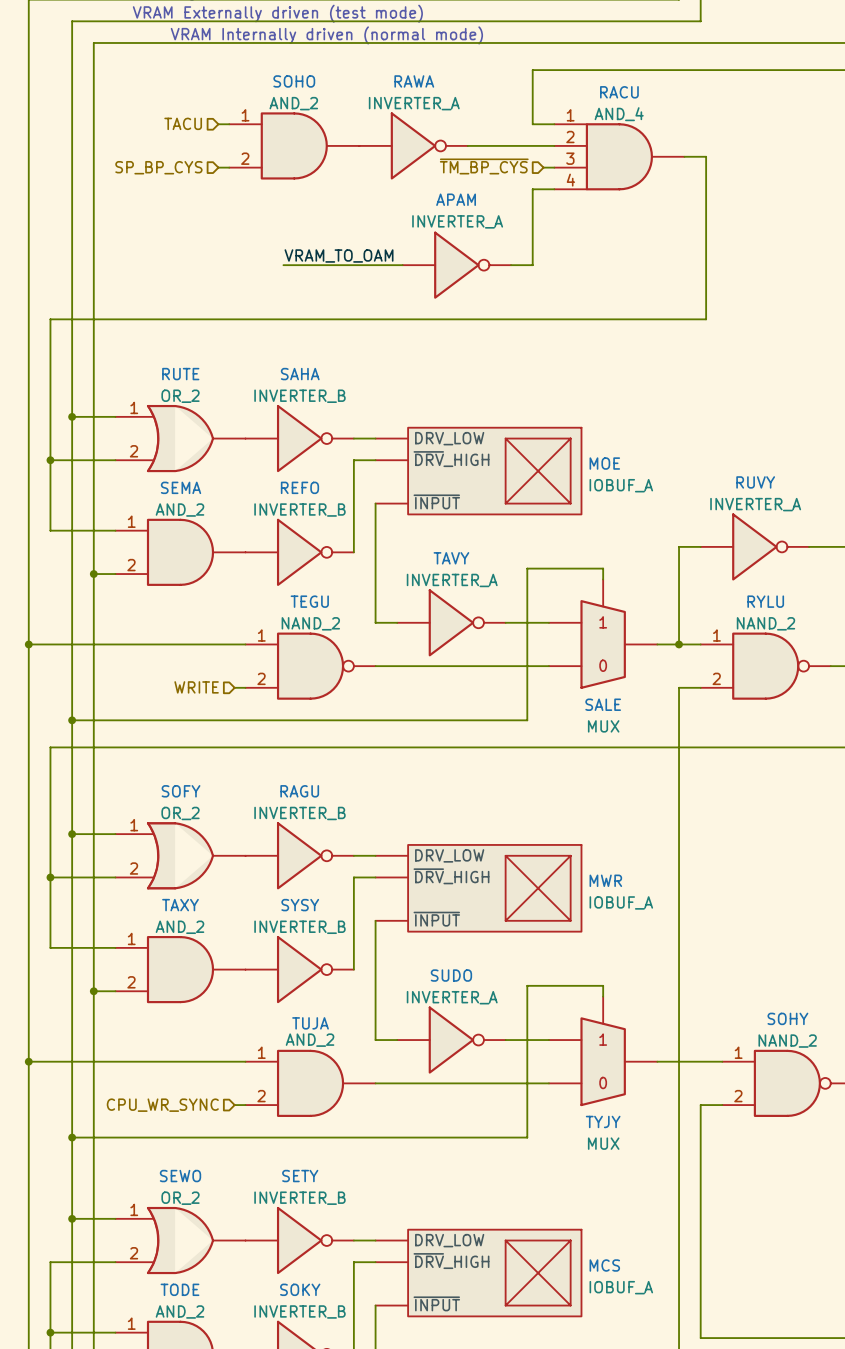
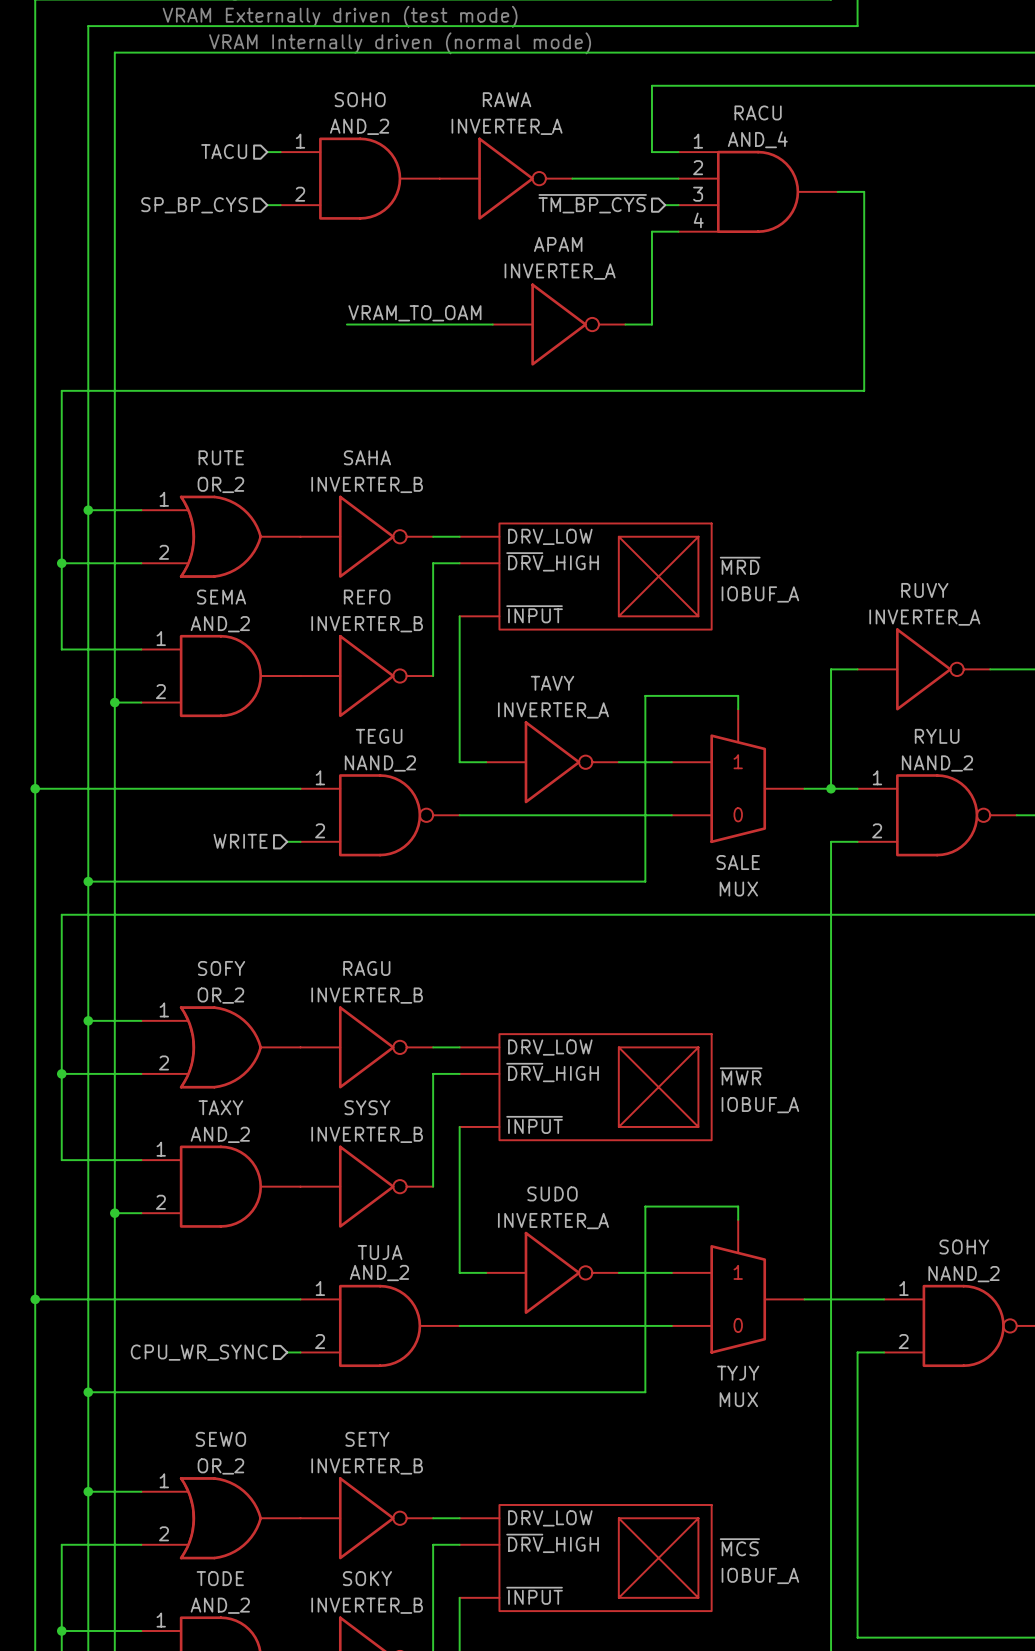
MOE name: MOE (604, 463) -> ~{MRD} (740, 565)
MWR name: MWR (605, 880) -> ~{MWR} (741, 1076)
MCS name: MCS (604, 1265) -> ~{MCS} (739, 1547)

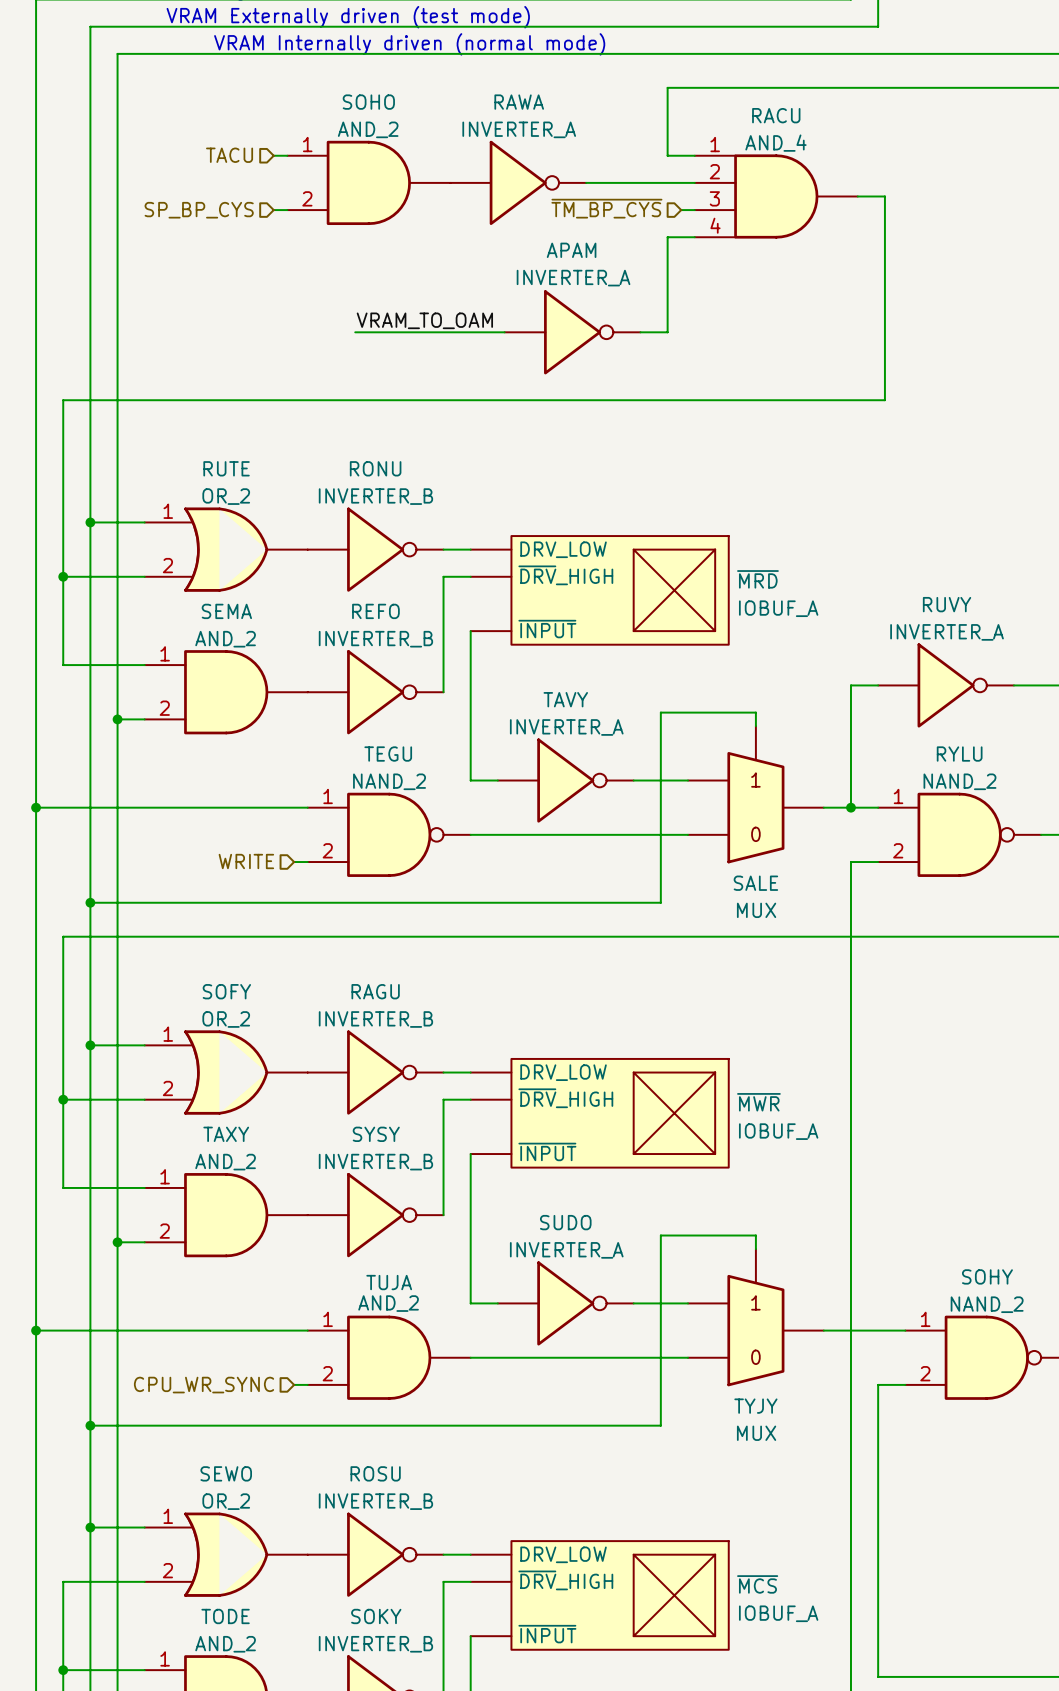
SAHA name: SAHA (367, 457) -> RONU (375, 468)
SETY name: SETY (367, 1439) -> ROSU (375, 1473)

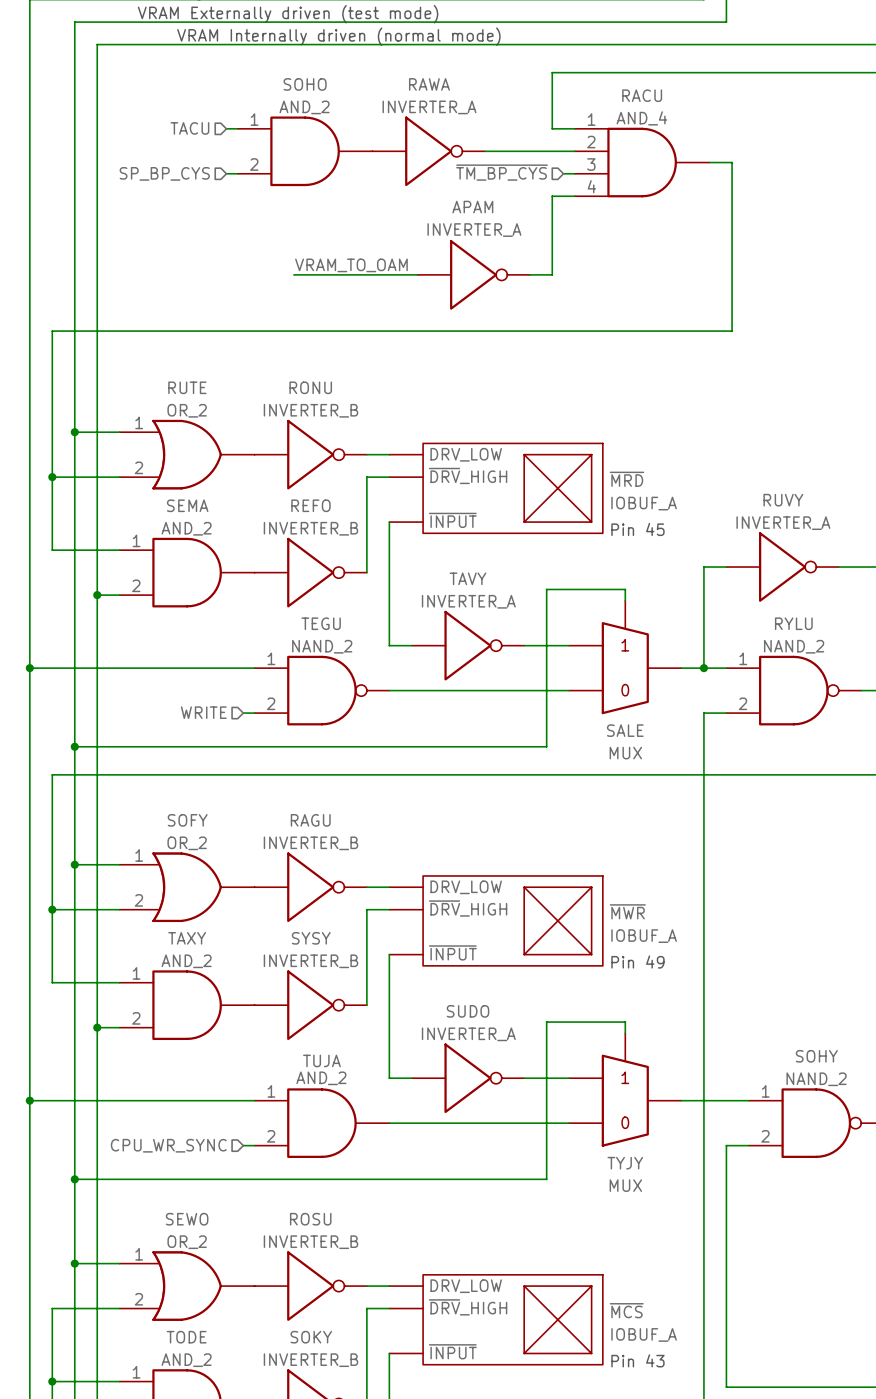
text: none -> Pin 45 (637, 529)
text: none -> Pin 49 (637, 962)
text: none -> Pin 43 (637, 1360)

